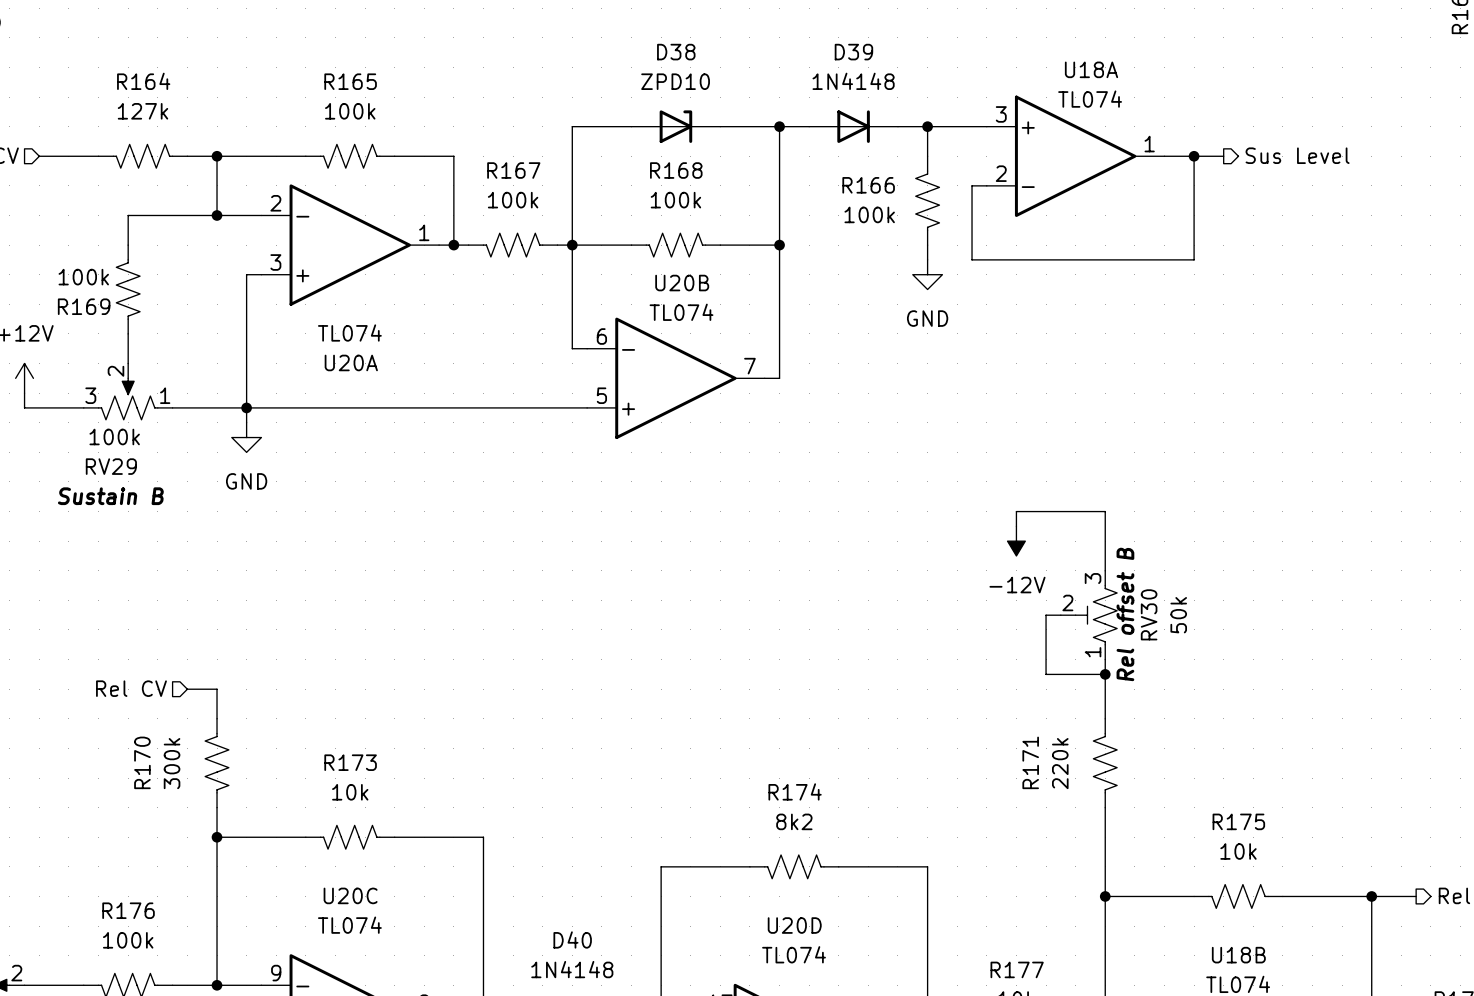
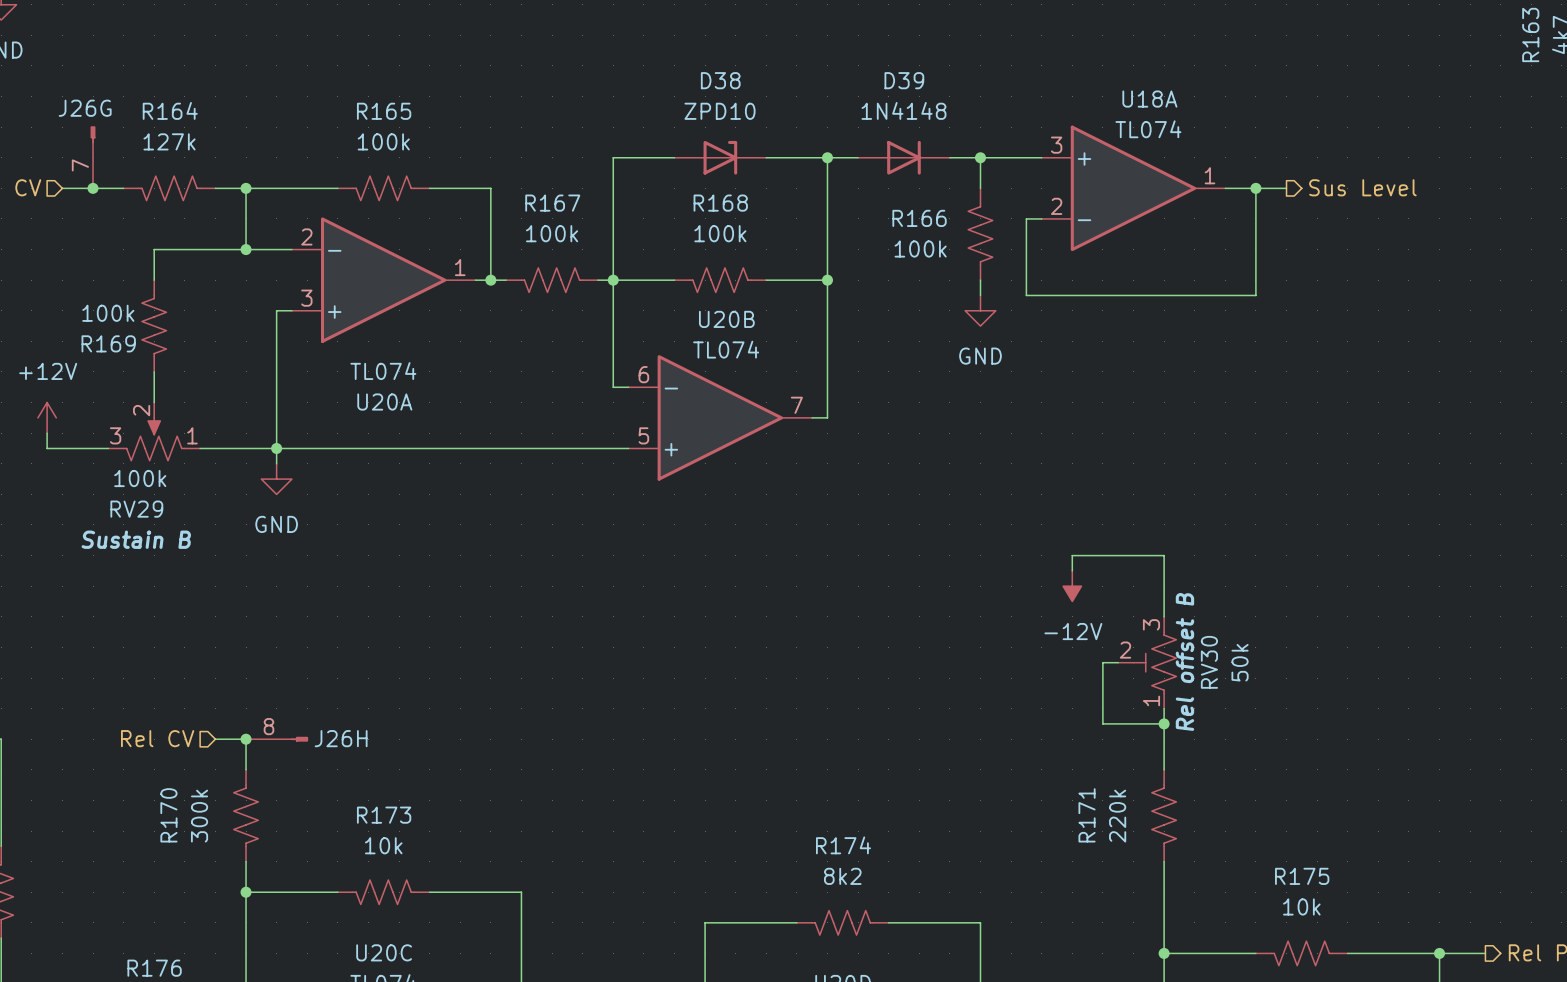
J26G: none -> (93, 157)
junction: none -> (93, 188)
junction: none -> (246, 739)
J26H: none -> (277, 739)

